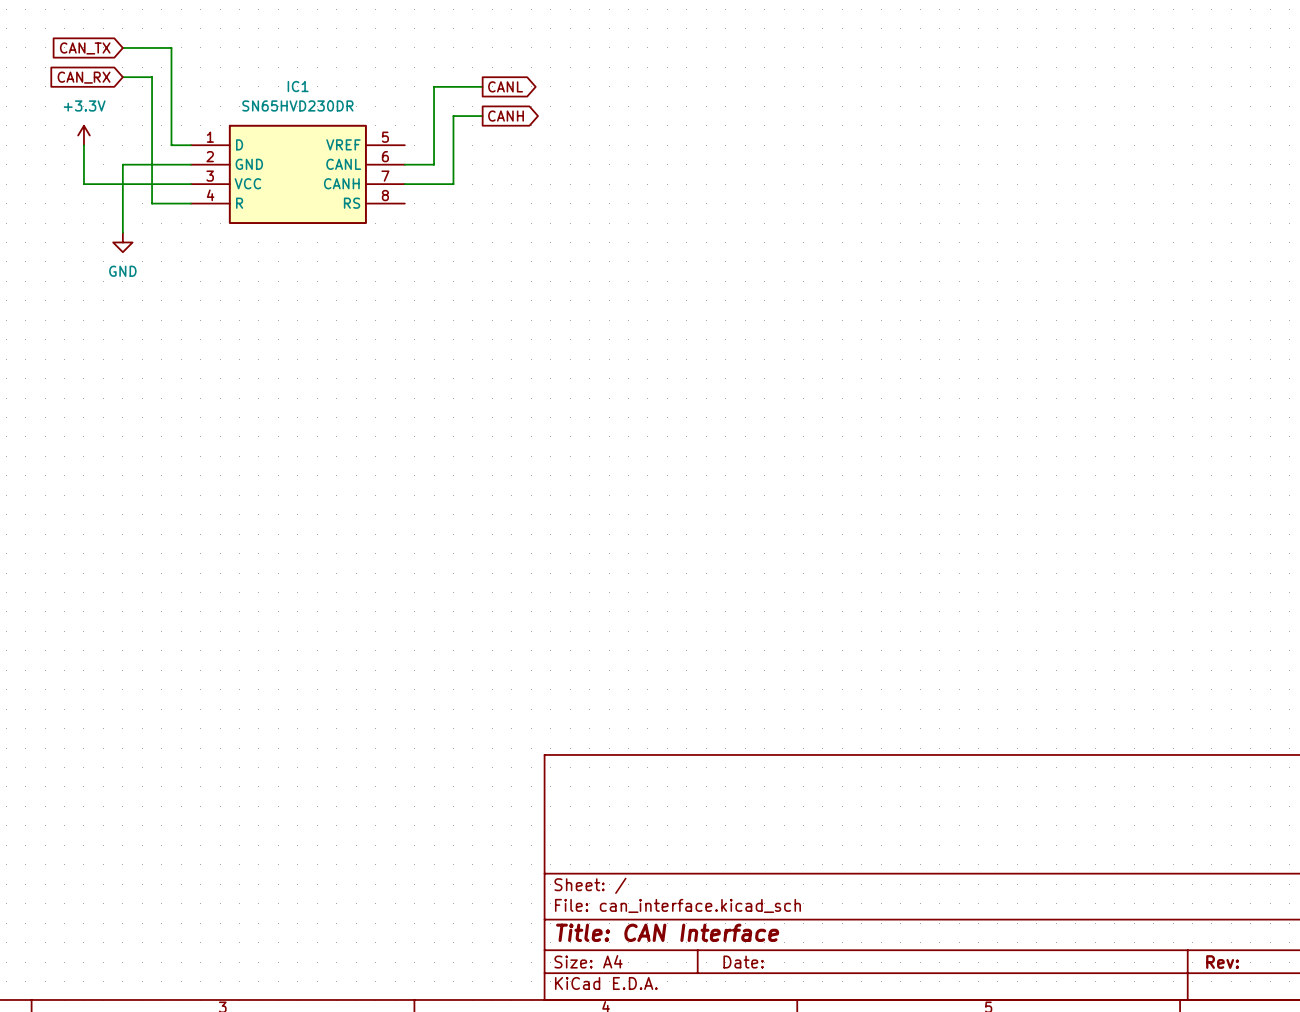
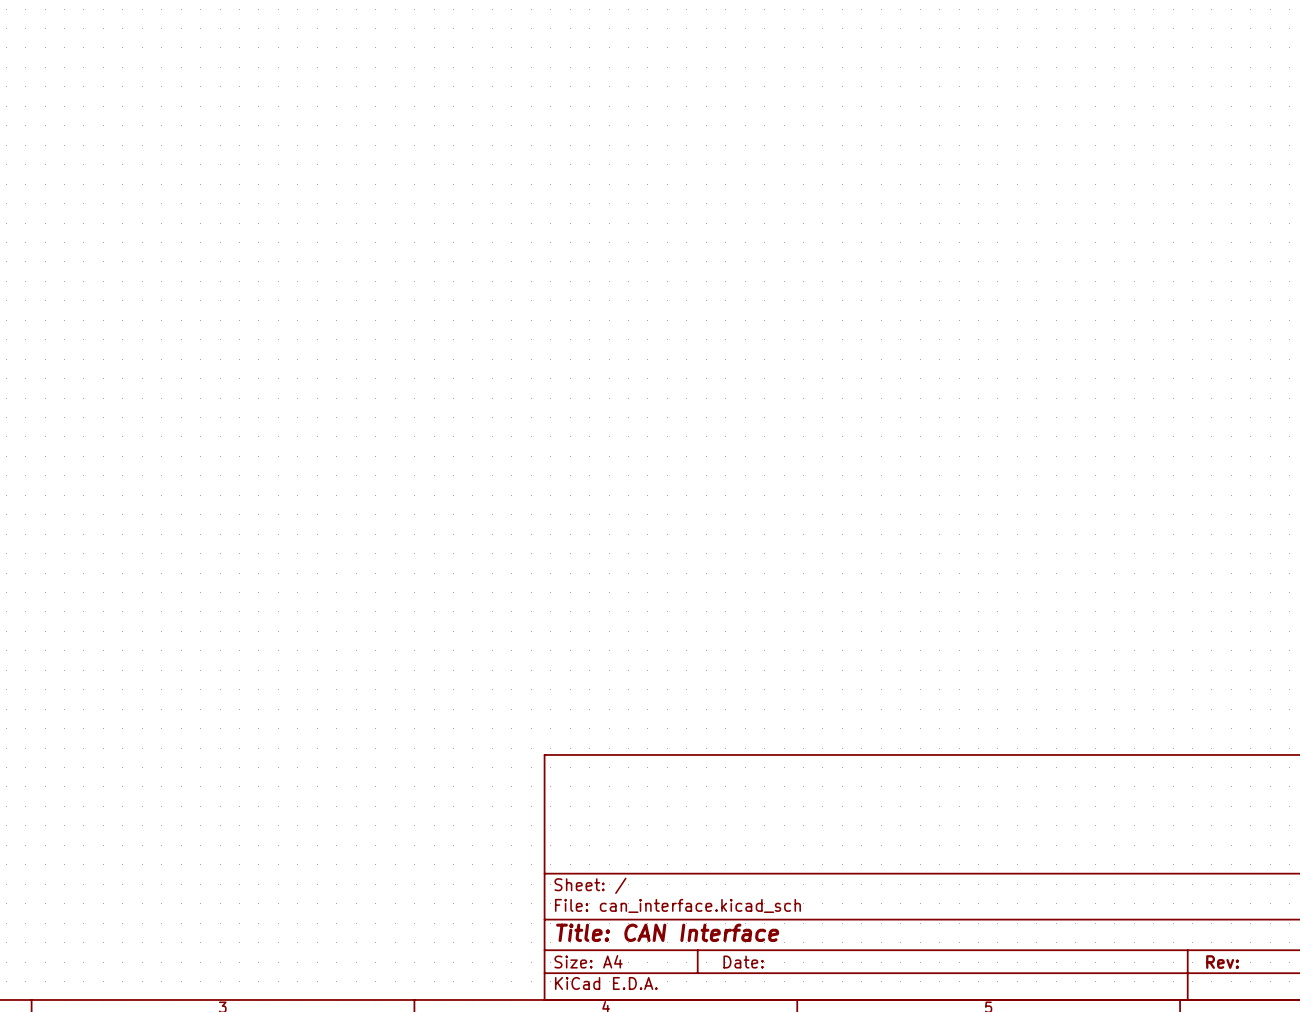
wire: (122, 47) (171, 47) (171, 145) (190, 145) -> none
global label: CAN_TX (85, 48) -> none
global label: CAN_RX (84, 77) -> none
wire: (122, 77) (152, 77) (152, 203) (190, 203) -> none
wire: (482, 86) (434, 86) (434, 164) (404, 164) -> none
global label: CANL (505, 86) -> none
wire: (482, 116) (453, 116) (453, 184) (404, 184) -> none
global label: CANH (506, 116) -> none
power symbol: +3.3V (83, 135) -> none
wire: (83, 145) (83, 184) (190, 184) -> none
wire: (190, 164) (122, 164) (122, 232) -> none
IC1: SN65HVD230DR (297, 174) -> none
power symbol: GND (122, 242) -> none

